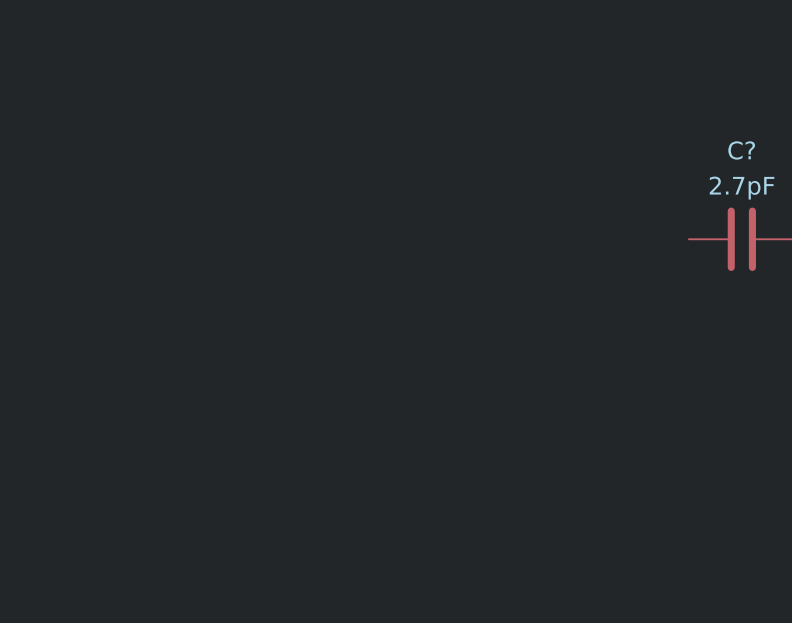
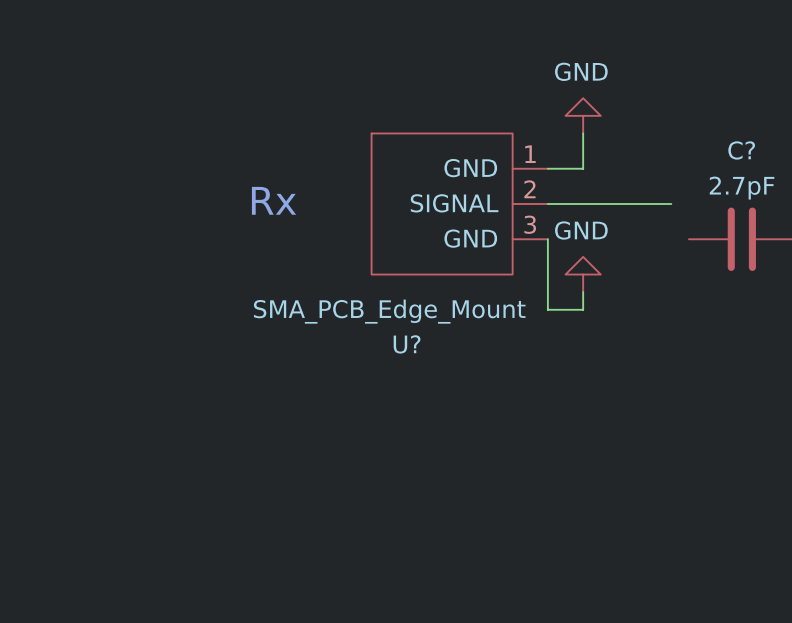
power symbol: none -> GND (583, 115)
wire: none -> (583, 133) (583, 168) (547, 168)
text: none -> Rx (274, 200)
U?: none -> SMA_PCB_Edge_Mount (459, 204)
wire: none -> (547, 204) (671, 204)
wire: none -> (547, 239) (547, 309) (583, 309) (583, 292)
power symbol: none -> GND (583, 274)

